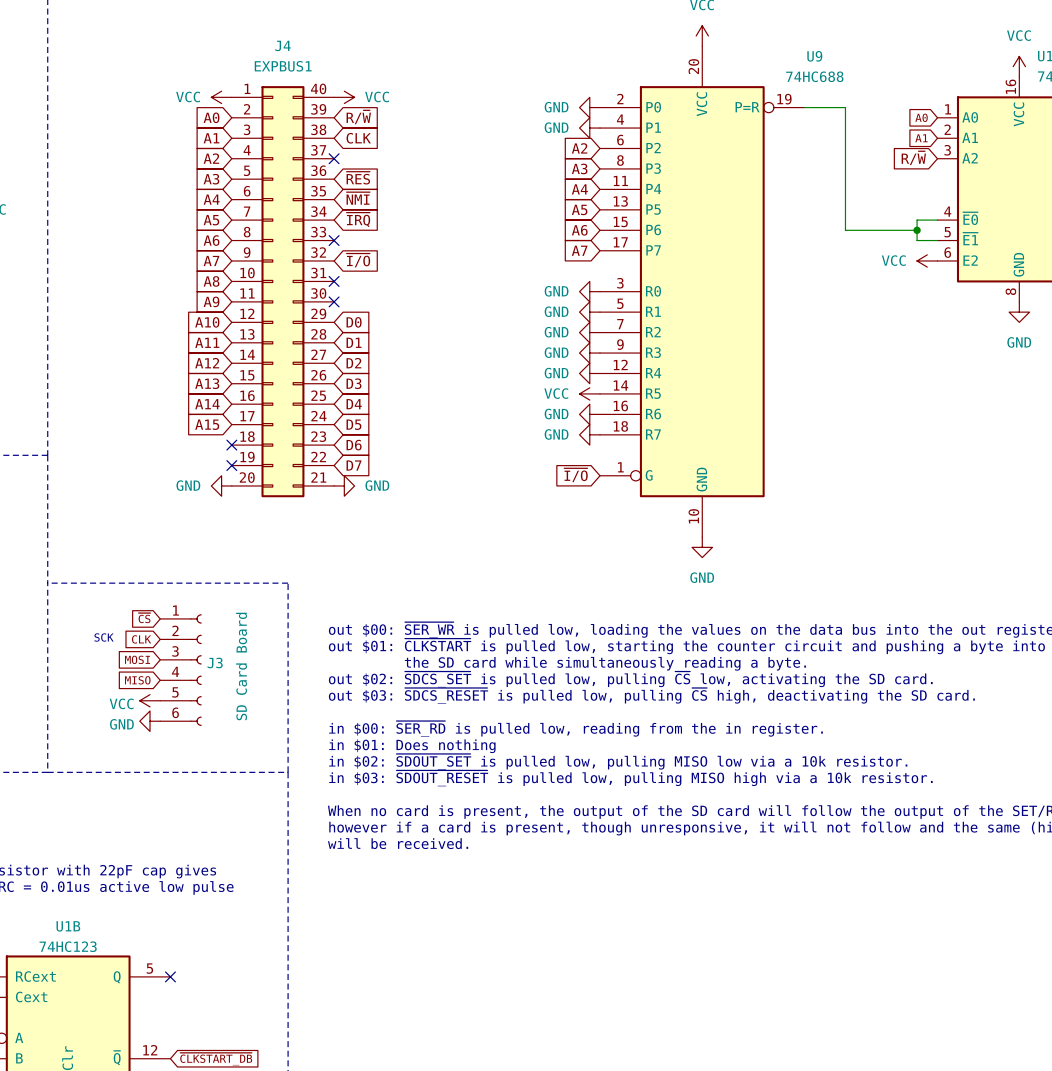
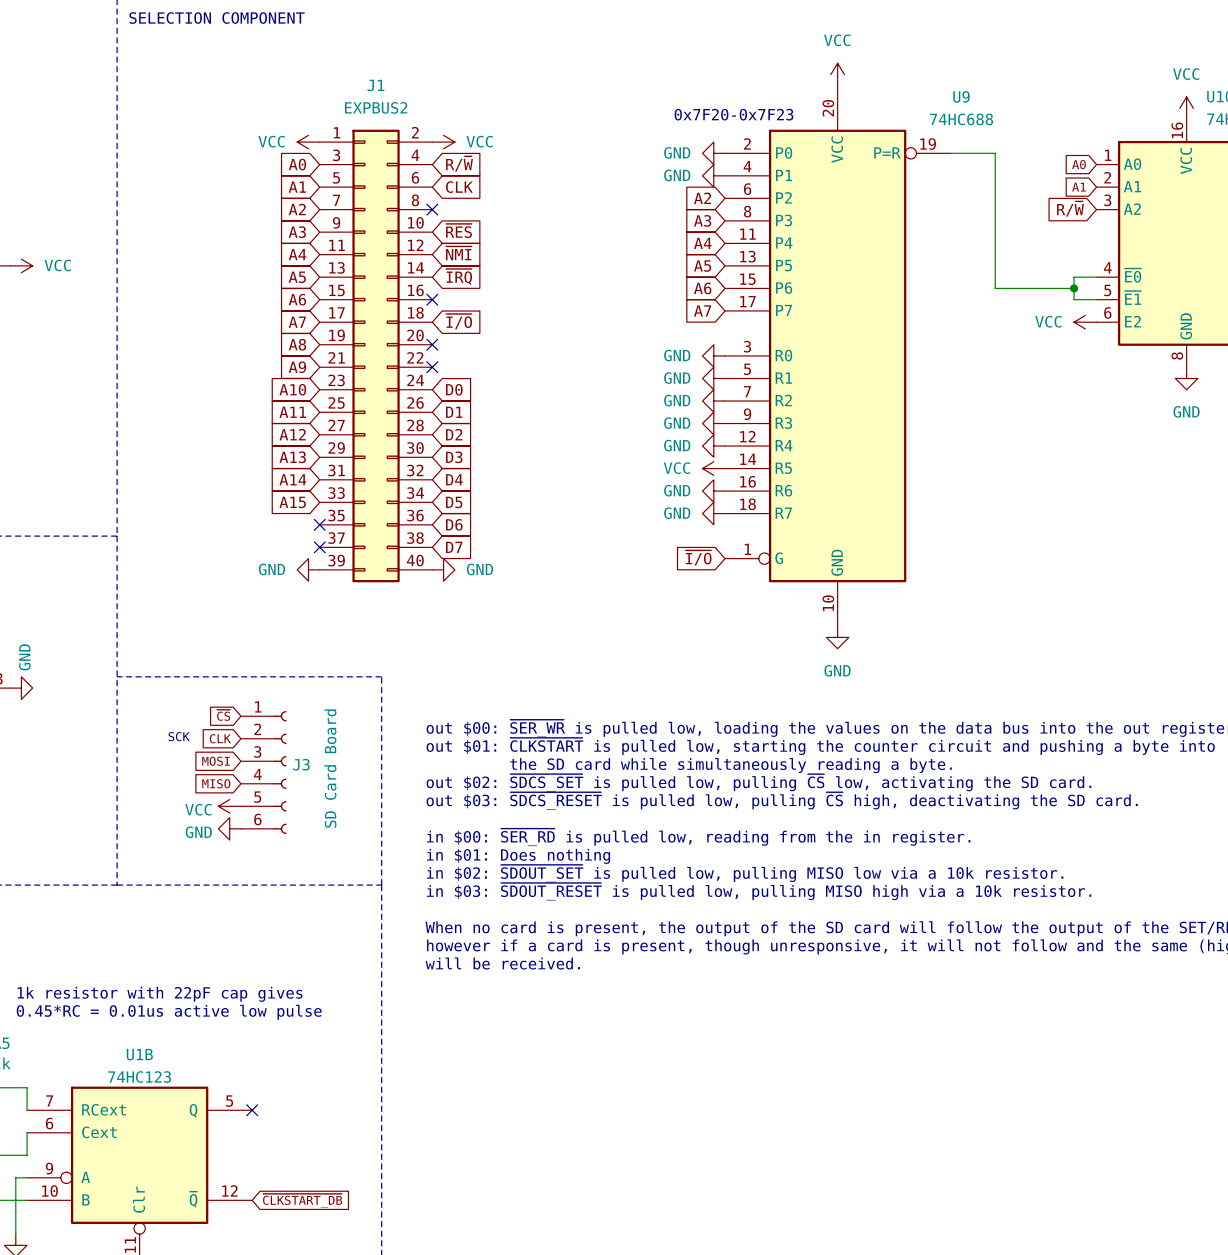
J4 name: J4 (283, 45) -> J1 (375, 85)
J4 value: EXPBUS1 (283, 66) -> EXPBUS2 (376, 107)
text: none -> 0x7F20-0x7F23 (733, 114)
J4 symbol: [231, 86, 335, 498] -> [319, 129, 433, 583]

